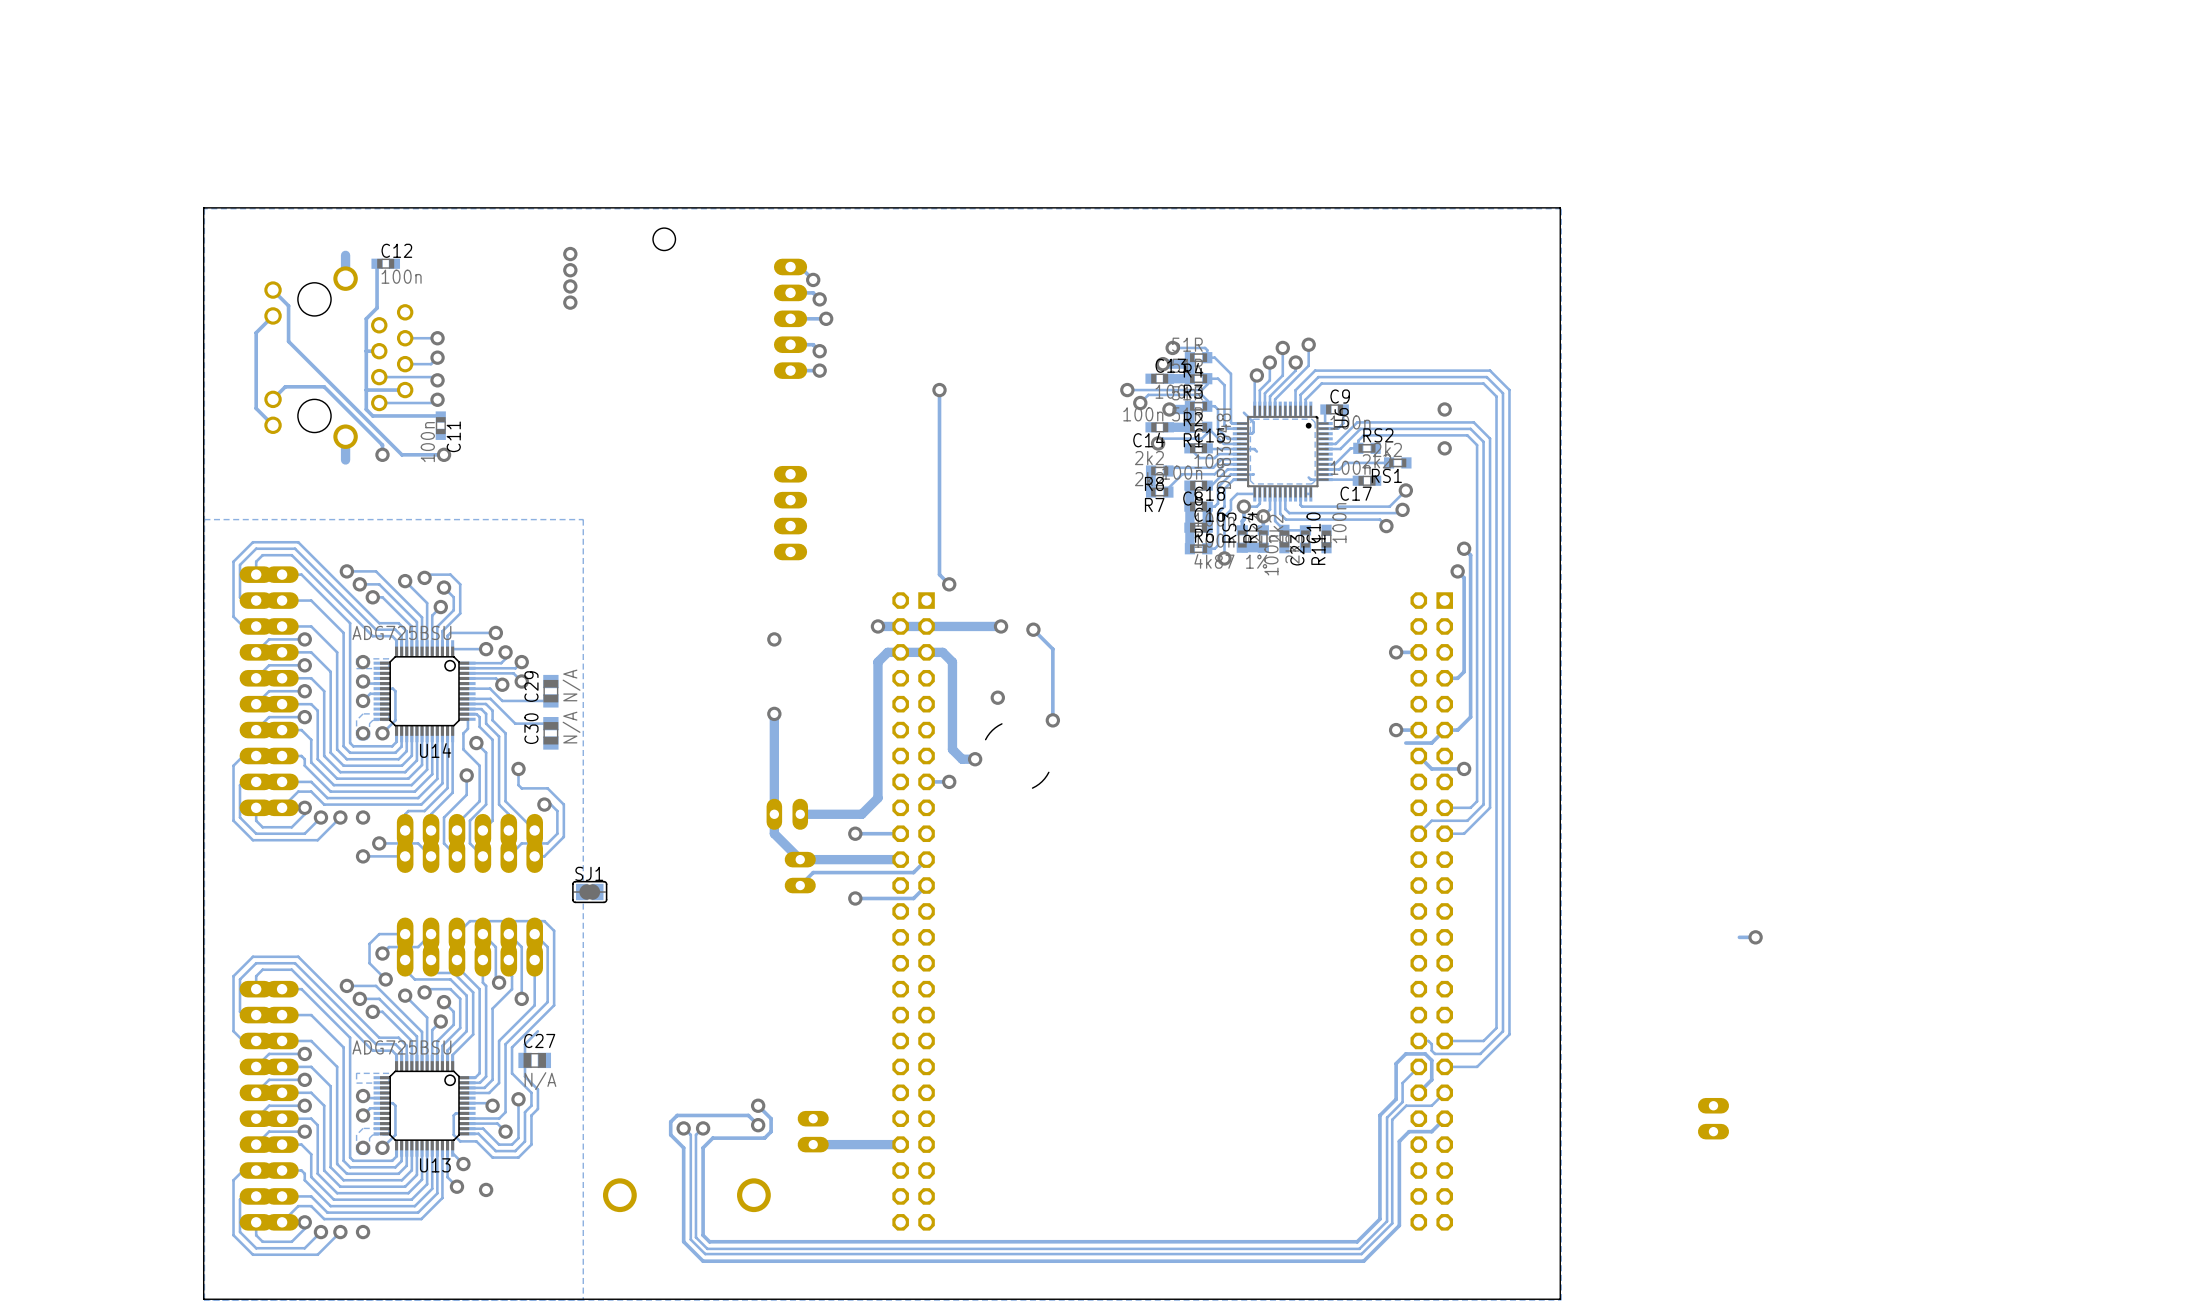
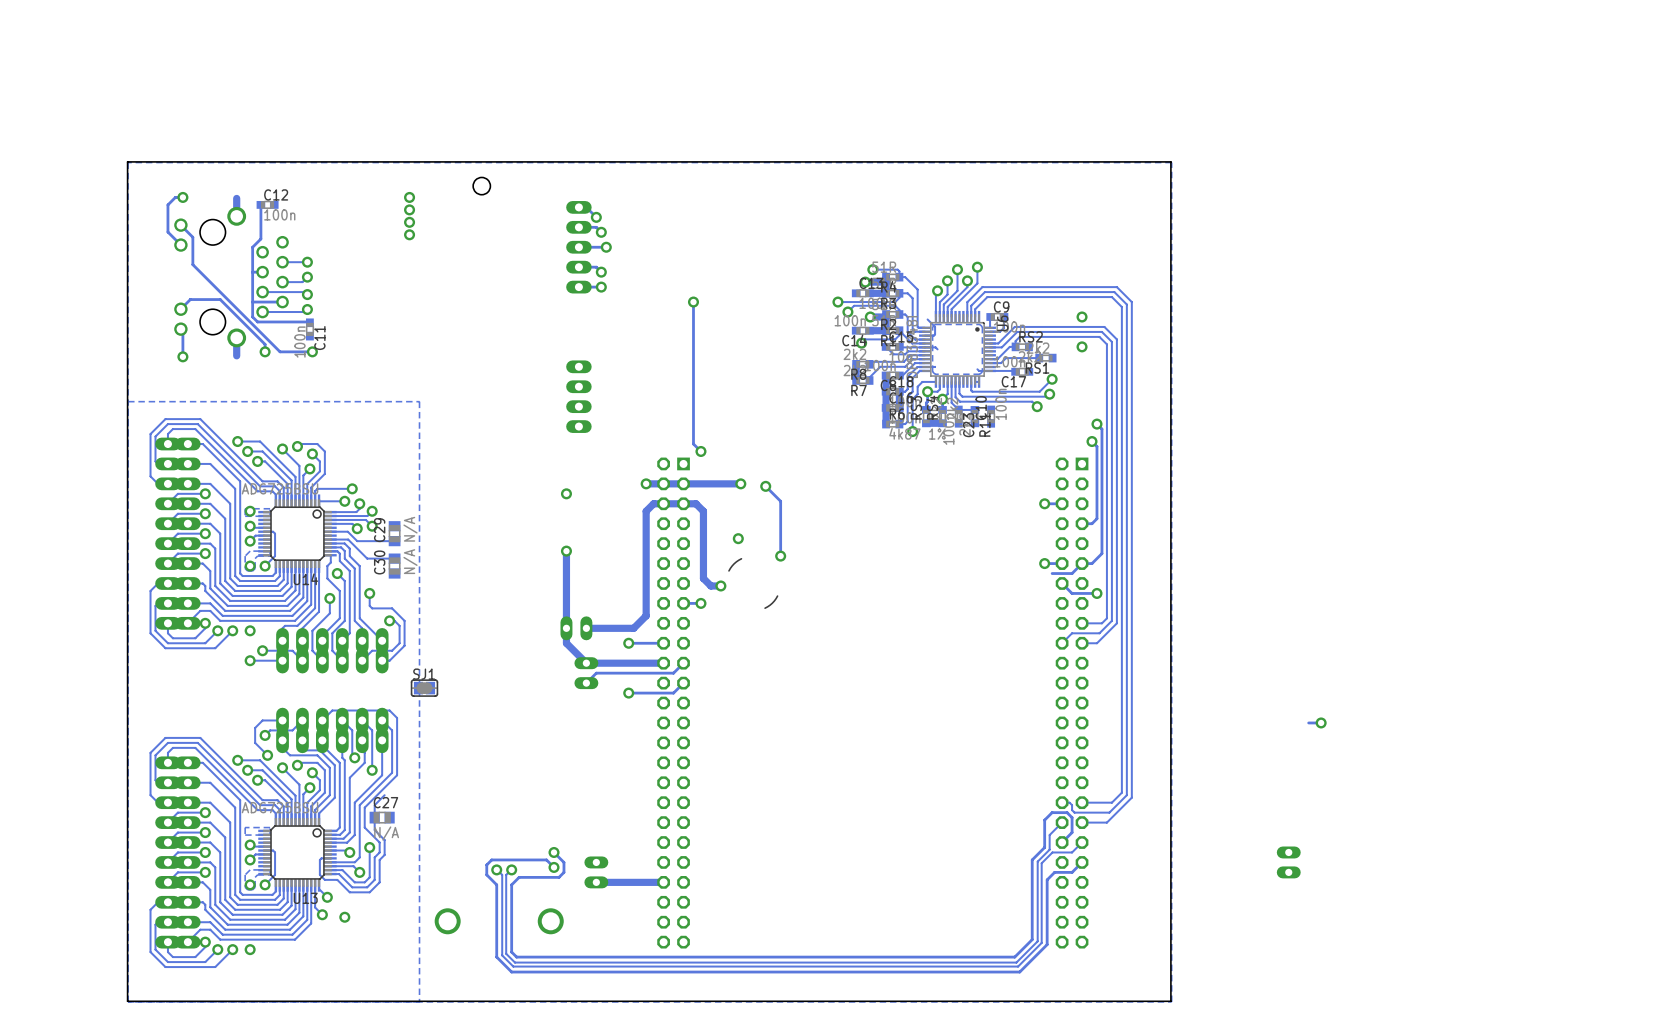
track: none -> (182, 197) (175, 197) (167, 204) (167, 232) (180, 245)
via: none -> (182, 197)
track: (273, 315) (256, 332) (256, 408) (273, 425) -> (182, 356) (182, 331) (180, 329)
via: none -> (182, 356)

